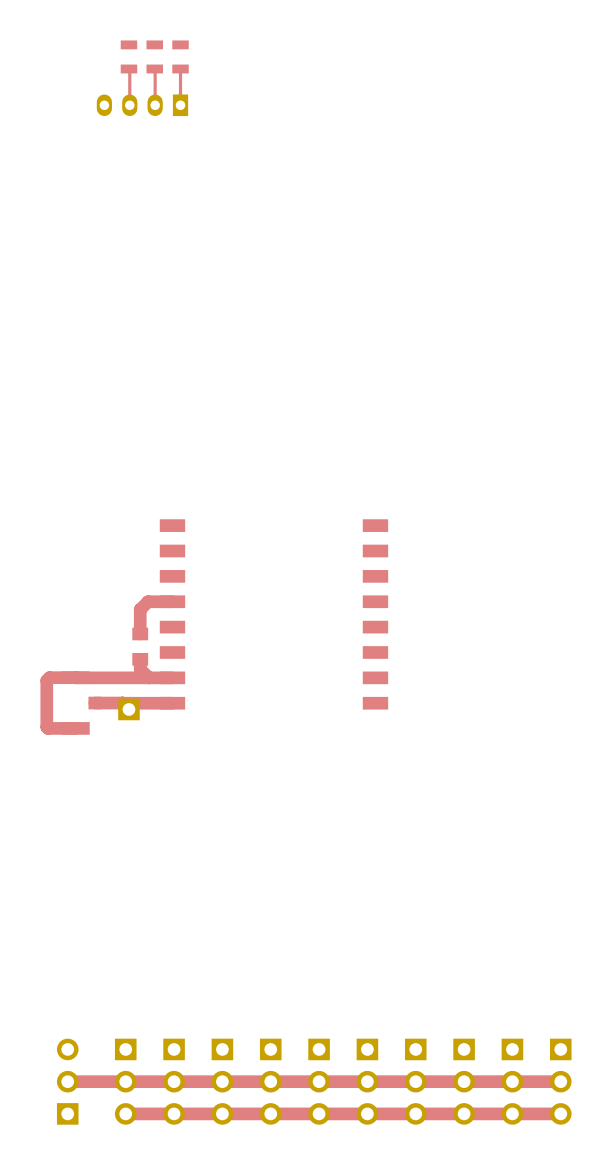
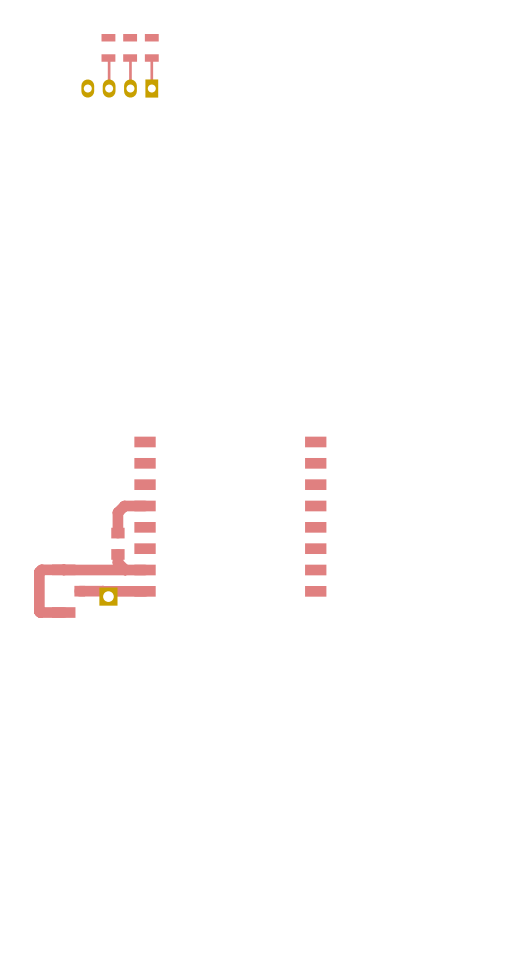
part: (67, 1081) -> none
part: (125, 1081) -> none
part: (174, 1081) -> none
part: (222, 1081) -> none
part: (270, 1081) -> none
part: (319, 1081) -> none
part: (367, 1081) -> none
part: (415, 1081) -> none
part: (464, 1081) -> none
part: (512, 1081) -> none
top track: (560, 1081) (67, 1081) -> none
part: (560, 1081) -> none
top track: (560, 1113) (125, 1113) -> none

